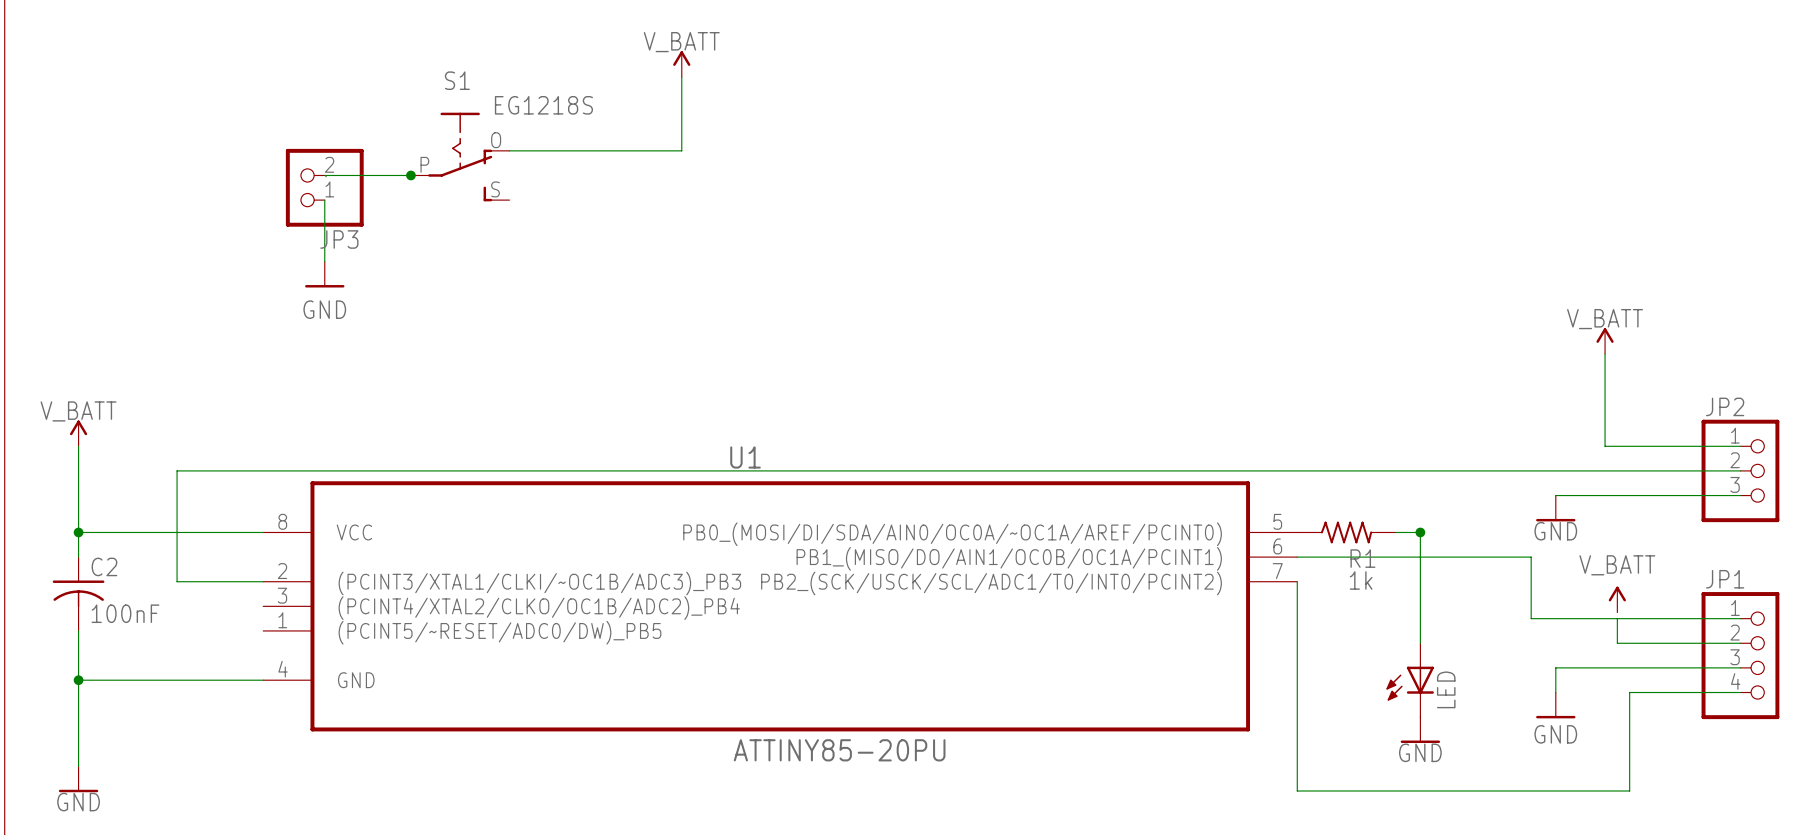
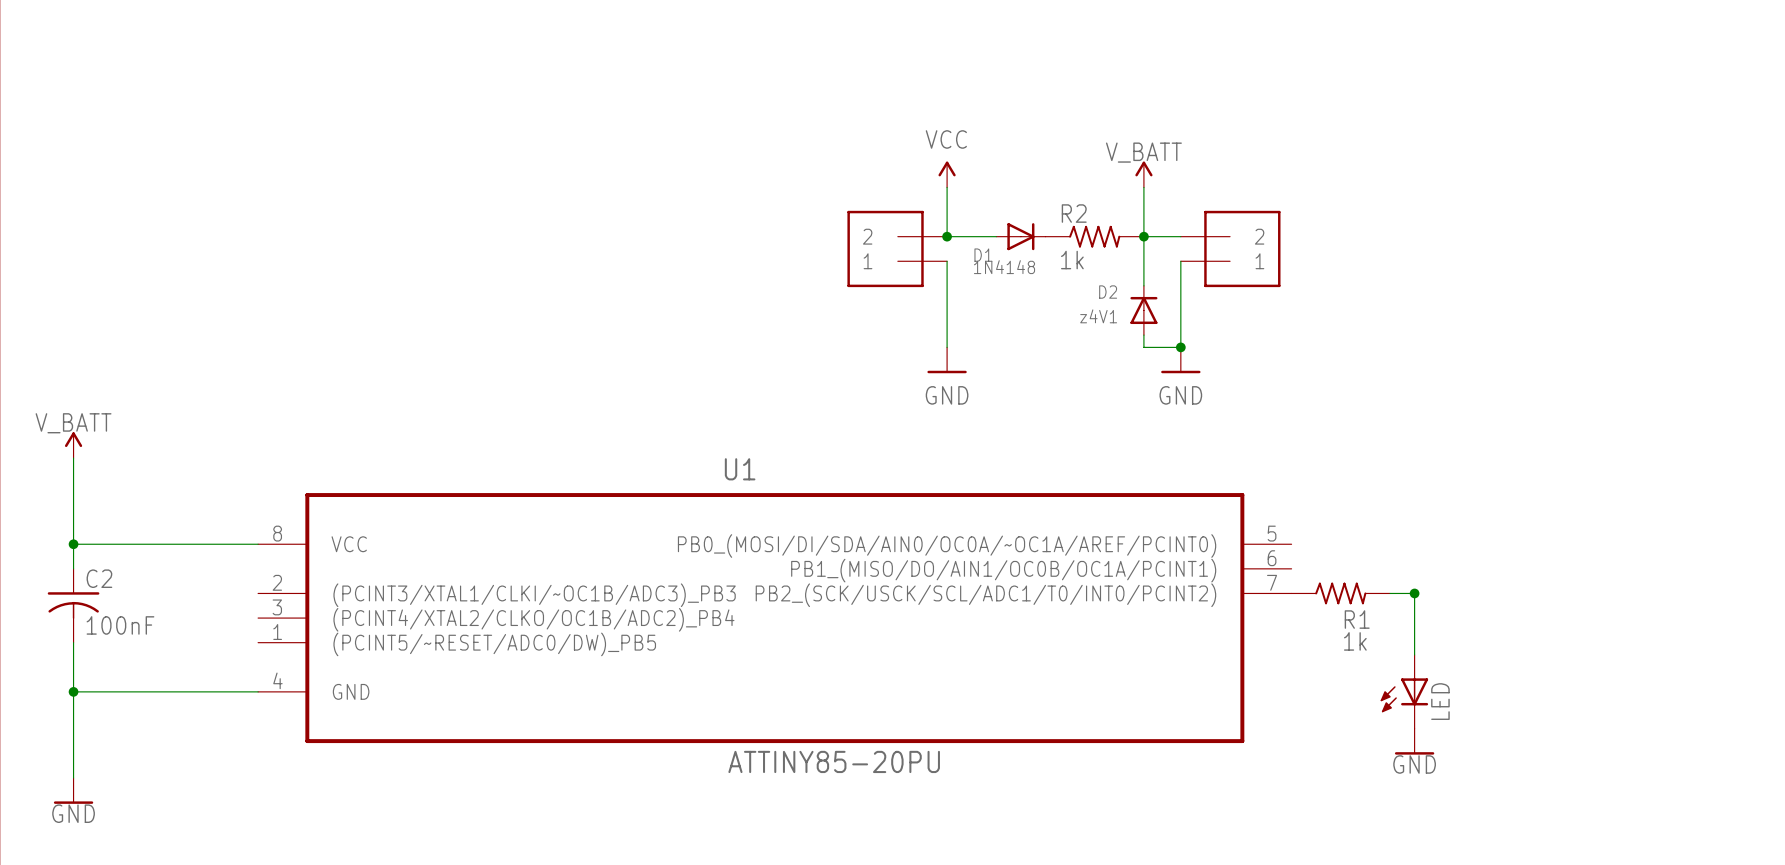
power symbol: V_BATT (681, 64) -> none
wire: (681, 77) (681, 150) (509, 150) -> none
S1: EG1218S (460, 157) -> none
power symbol: none -> VCC (947, 174)
power symbol: none -> V_BATT (1143, 174)
wire: (324, 175) (413, 175) -> none
wire: (326, 175) (326, 176) -> none
junction: (410, 175) -> none
wire: none -> (947, 187) (947, 236) (996, 236)
wire: none -> (1143, 187) (1143, 285)
JP3: (324, 187) -> none
wire: (324, 200) (324, 261) -> none
junction: none -> (947, 236)
D1: none -> 1N4148 (1020, 236)
R2: none -> 1k (1094, 236)
wire: none -> (1143, 236) (1180, 236)
junction: none -> (1143, 236)
part: none -> (897, 248)
part: none -> (1230, 248)
wire: none -> (947, 261) (947, 347)
wire: none -> (1180, 261) (1180, 347) (1143, 347) (1143, 335)
power symbol: GND (324, 274) -> none
D2: none -> z4V1 (1143, 310)
junction: none -> (1180, 347)
power symbol: V_BATT (1605, 341) -> none
power symbol: none -> GND (947, 360)
power symbol: none -> GND (1180, 360)
wire: (1605, 353) (1605, 446) (1740, 446) -> none
wire: (1740, 470) (177, 470) (177, 581) (263, 581) -> none
JP2: (1740, 470) -> none
wire: (1555, 495) (1740, 495) -> none
power symbol: GND (1555, 508) -> none
R1 position: (1346, 532) -> (1340, 593)
wire: (1395, 532) (1420, 532) (1420, 581) -> (1389, 593) (1414, 593)
junction position: (1420, 532) -> (1414, 593)
wire: (1297, 557) (1531, 557) (1531, 618) (1740, 618) -> none
wire: (1297, 581) (1297, 790) (1629, 790) (1629, 692) (1740, 692) -> none
power symbol: V_BATT (1617, 599) -> none
wire: (1617, 618) (1617, 643) (1740, 643) -> none
JP1: (1740, 655) -> none
wire: (1740, 667) (1555, 667) (1555, 692) -> none
power symbol: GND (1555, 705) -> none

